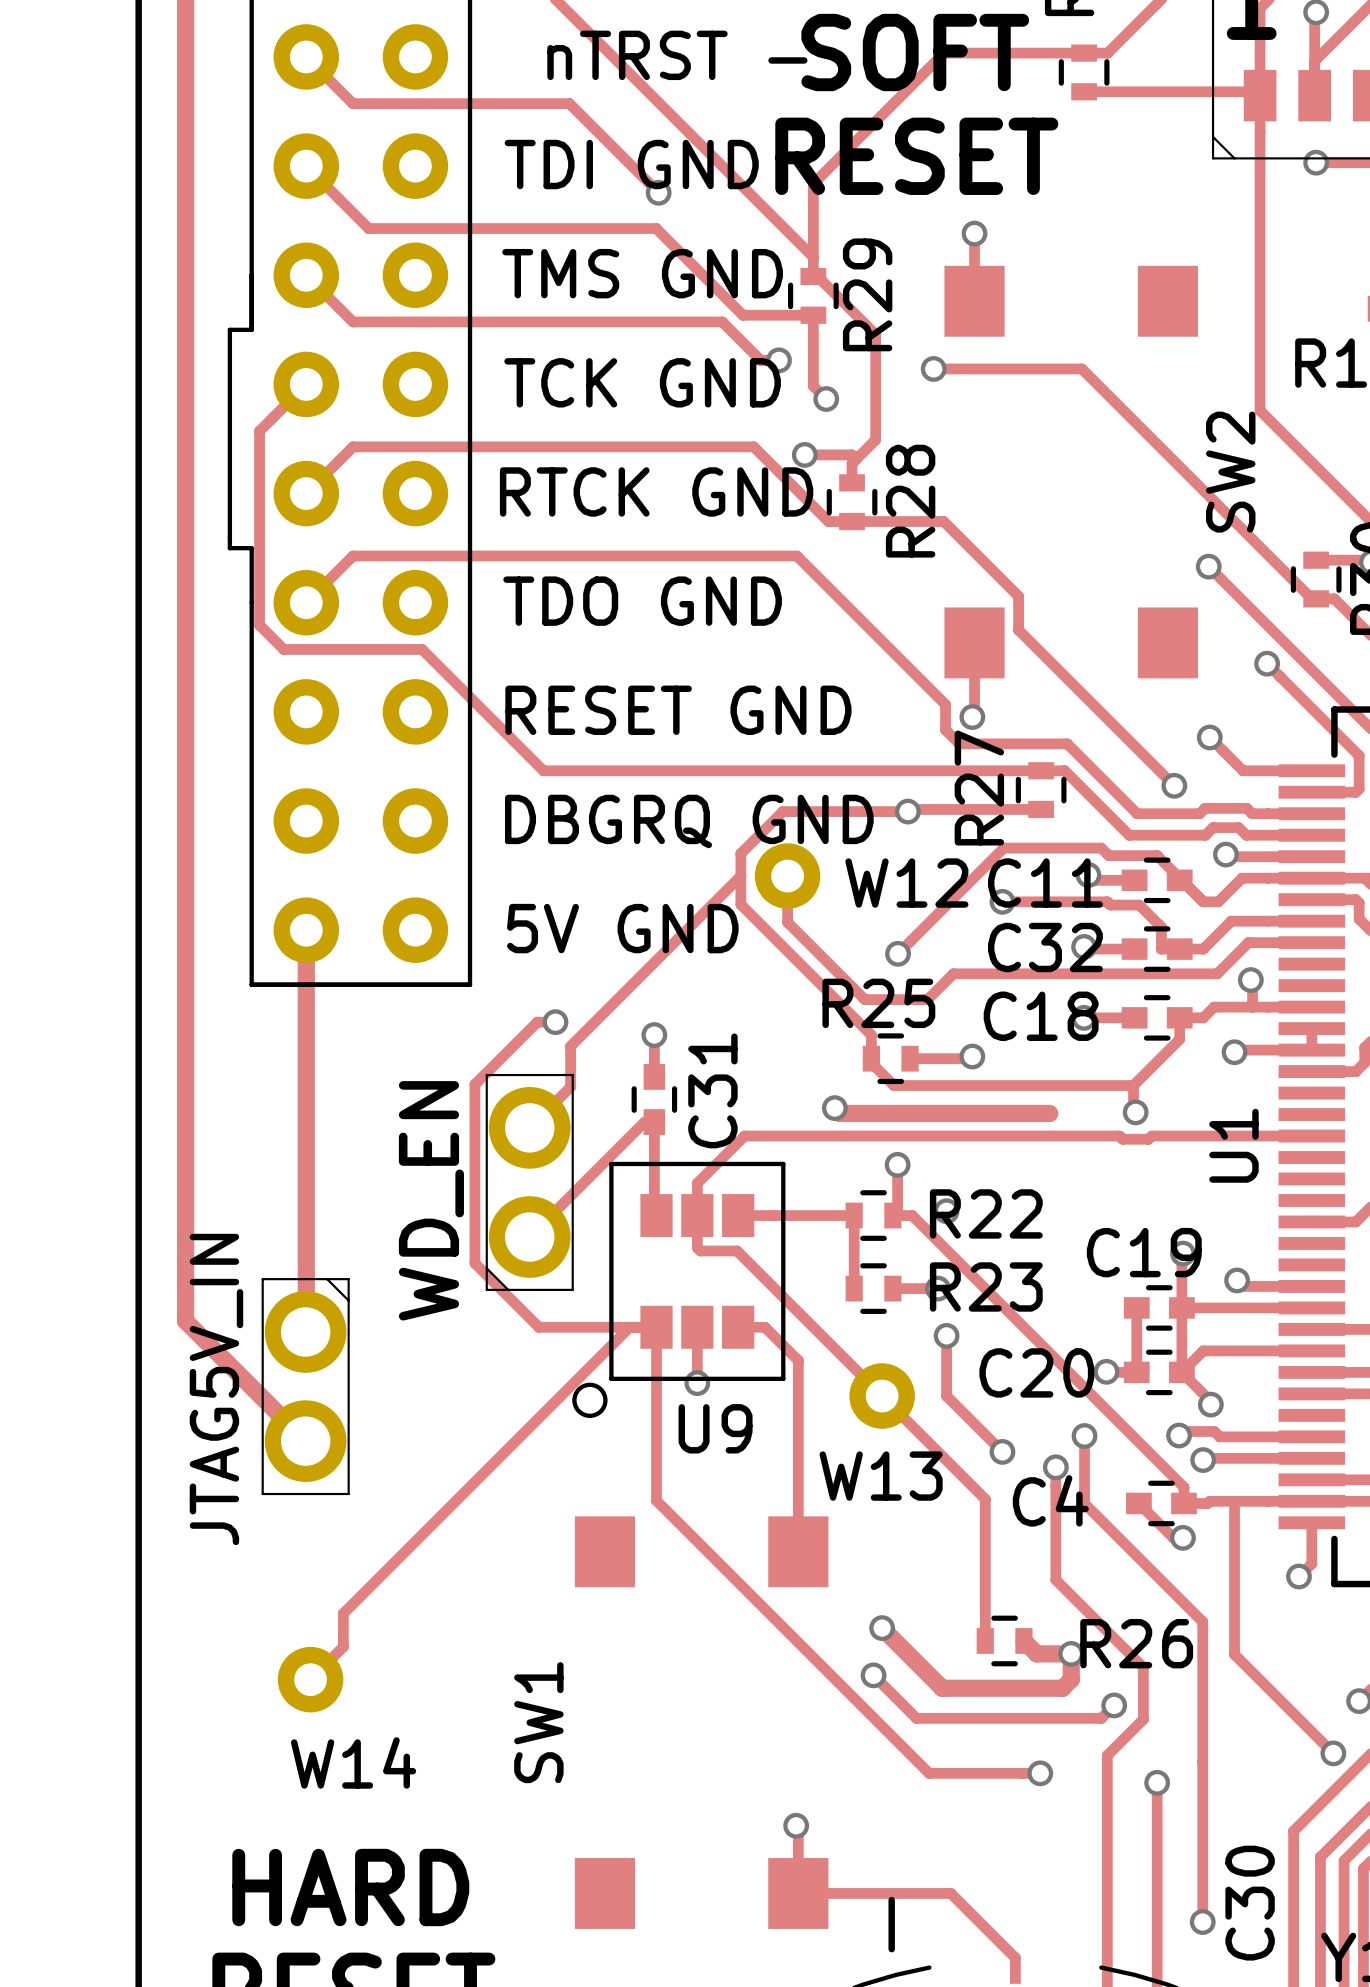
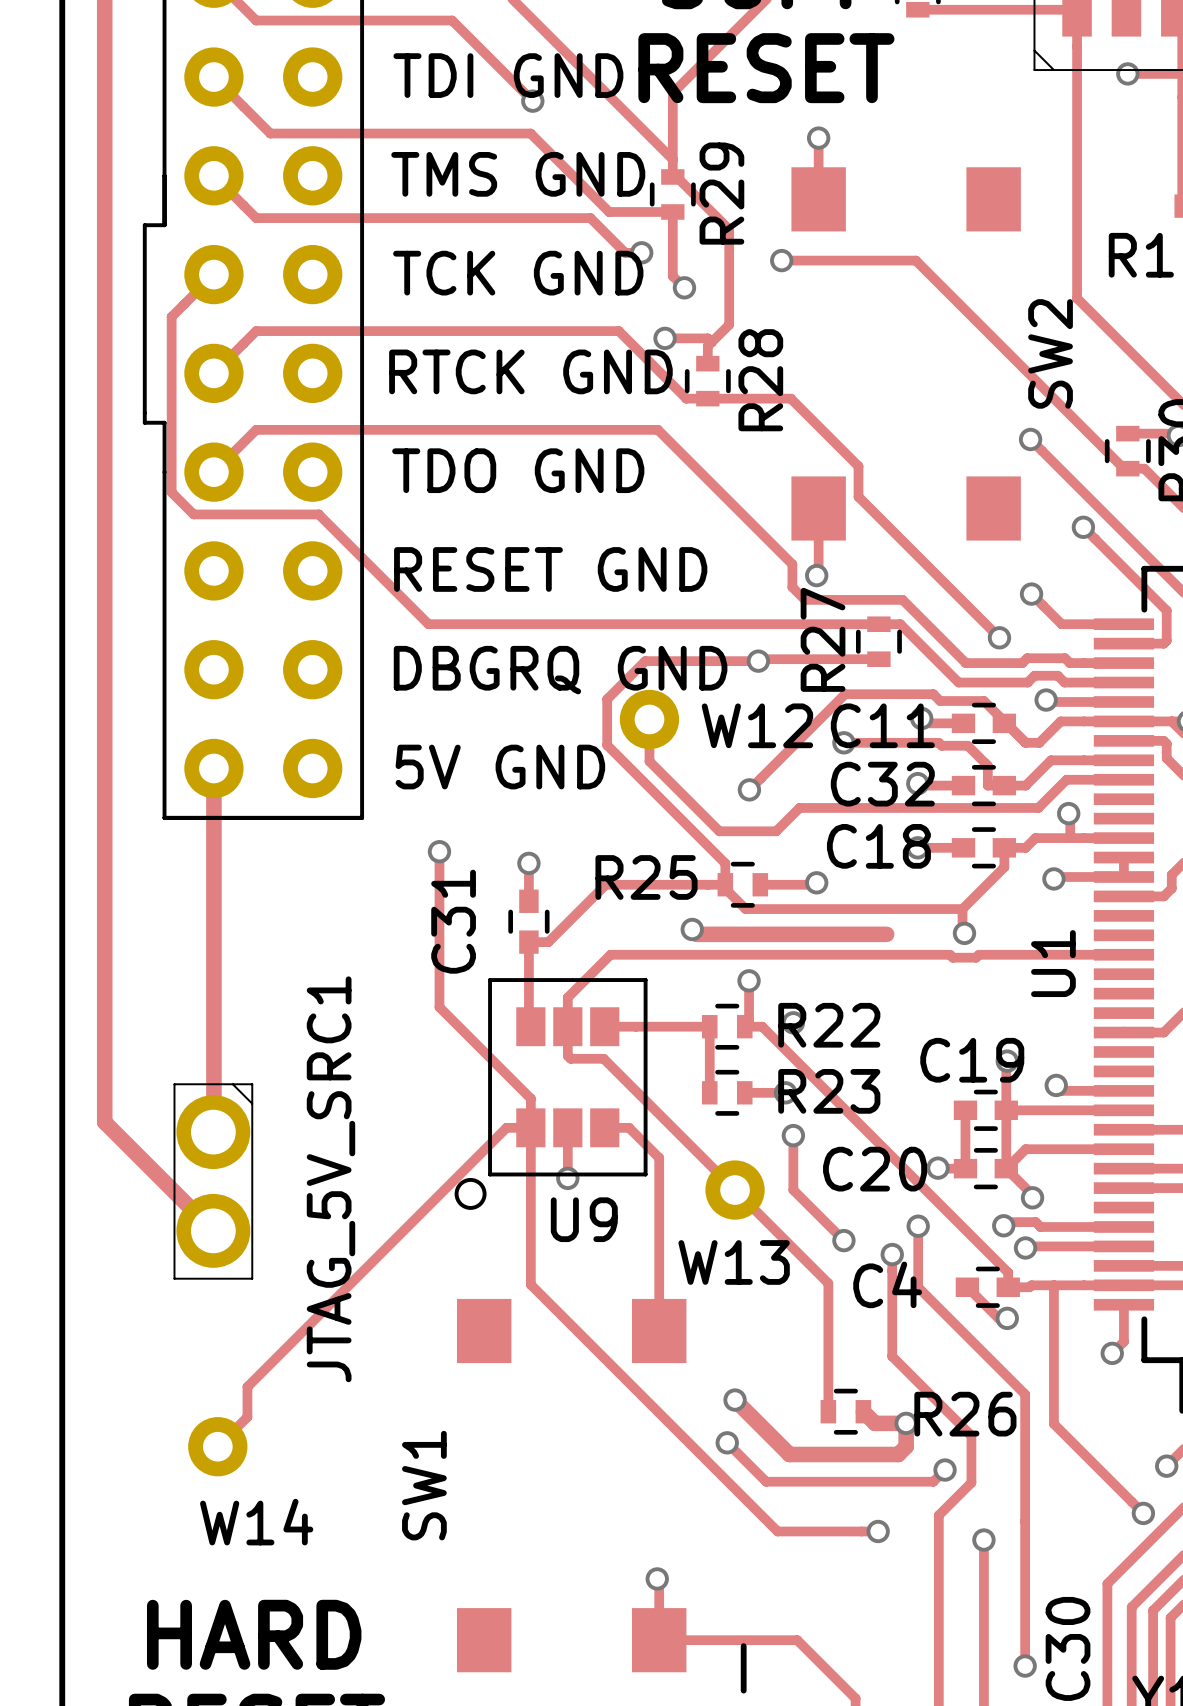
track: (740, 876) (570, 1046) (570, 1087) (529, 1127) -> none
R25 name position: R25 (878, 1003) -> R25 (646, 877)
track: (555, 1022) (537, 1022) (474, 1084) (474, 1263) (538, 1327) (629, 1327) -> (439, 851) (439, 1007) (530, 1098) (530, 1127)
C31 name position: C31 (712, 1090) -> C31 (453, 921)
track: (654, 1122) (644, 1122) (529, 1237) -> (528, 942) (548, 942) (605, 884) (725, 884)
part: (529, 1182) -> none
text: WD_EN (431, 1200) -> none
JTAG5V_IN name: JTAG5V_IN (216, 1389) -> JTAG_5V_SRC1 (330, 1179)

